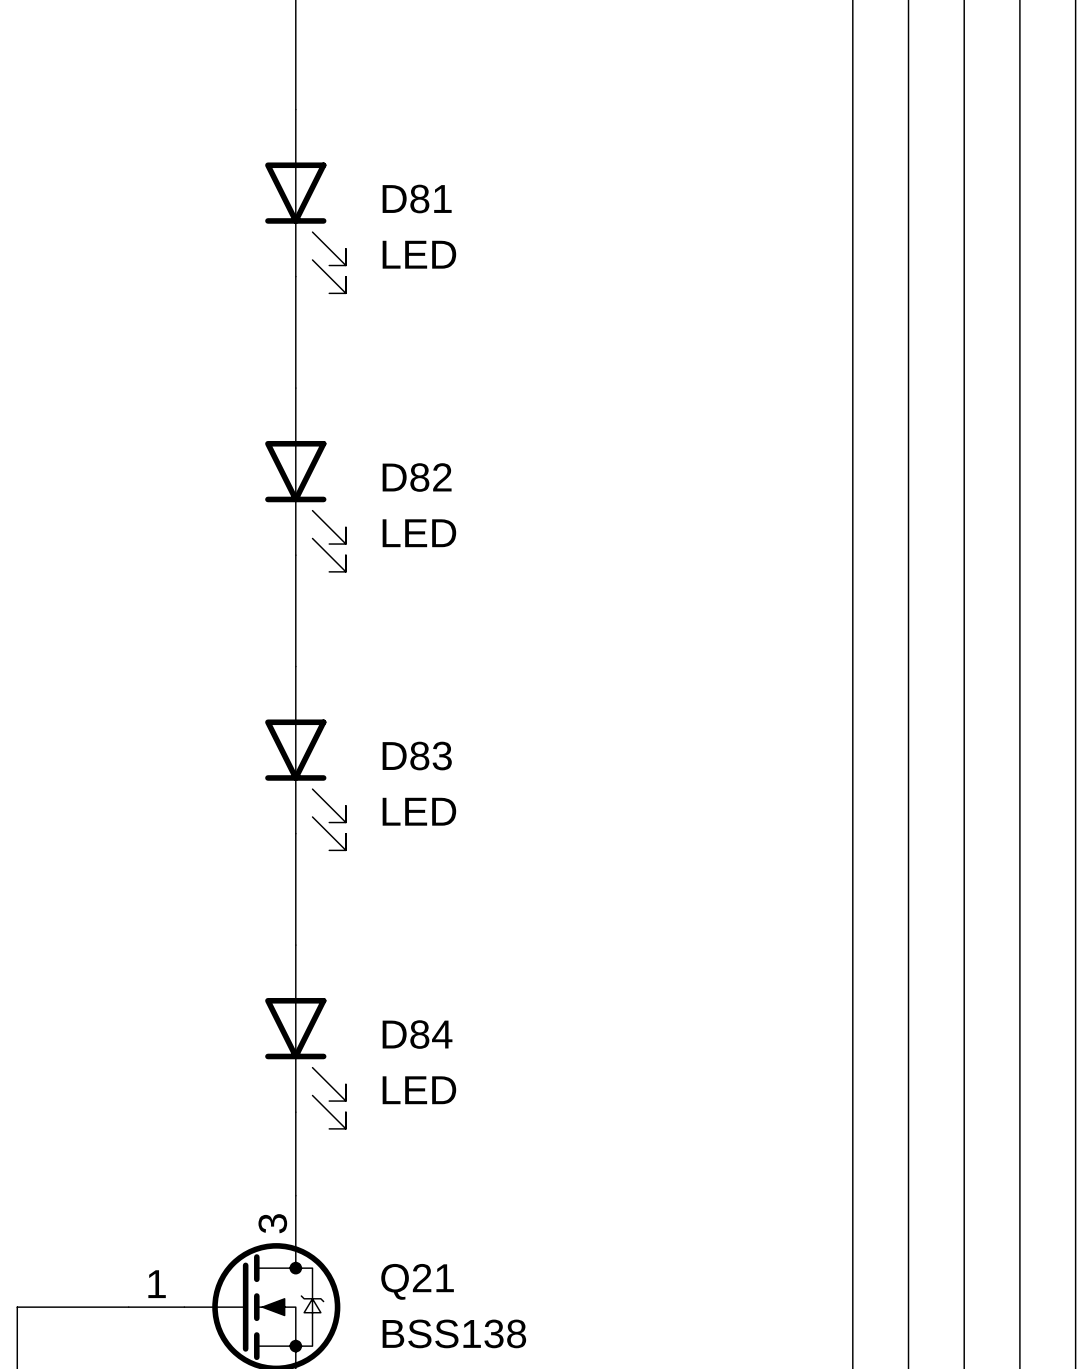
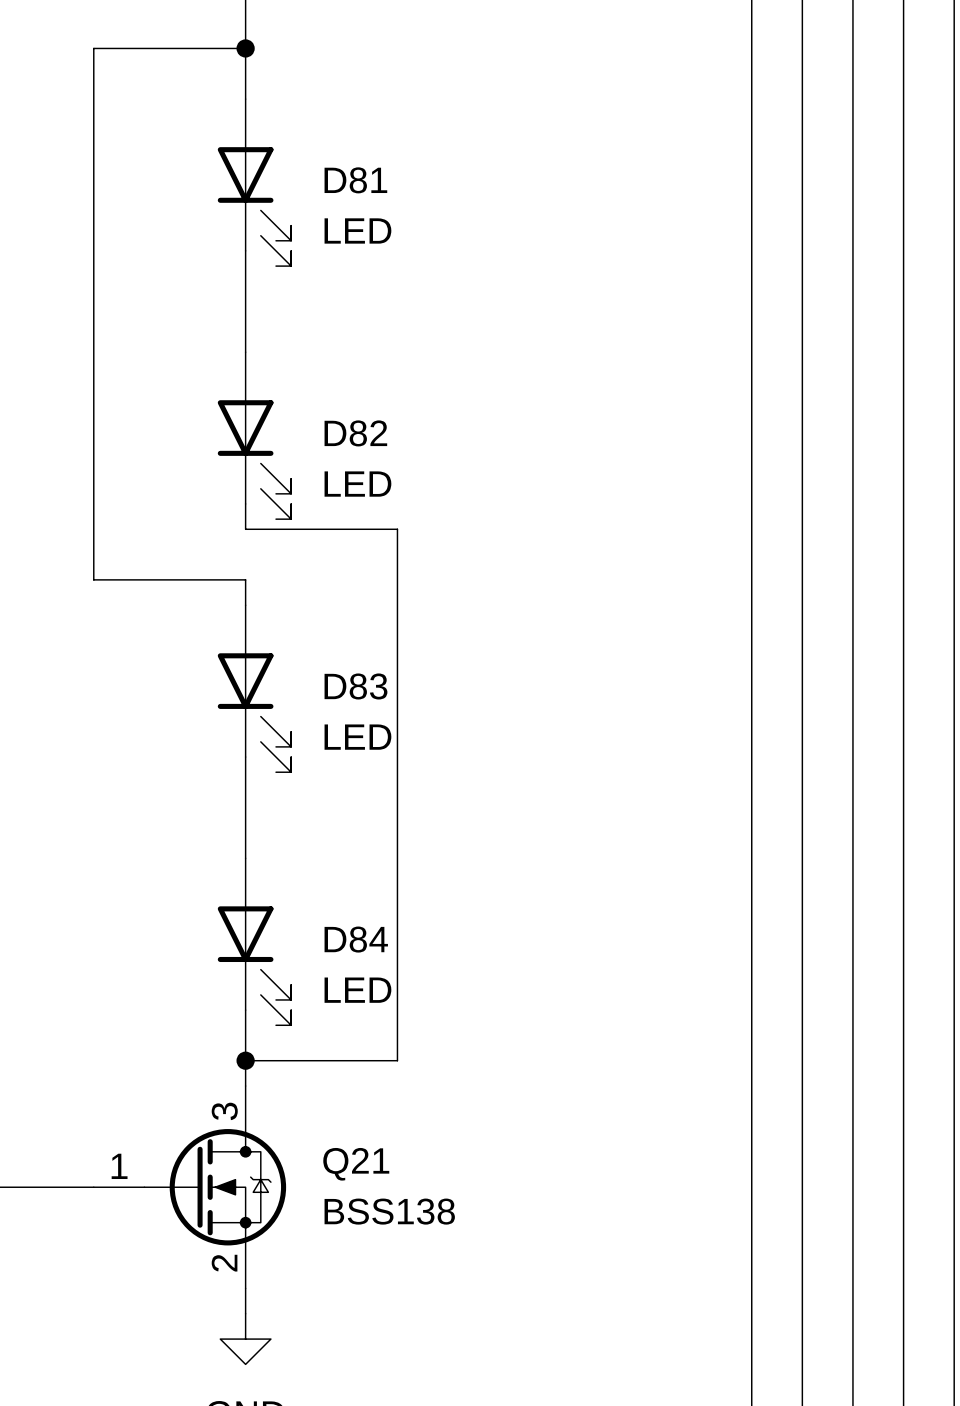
junction: none -> (245, 48)
wire: (295, 583) (295, 638) -> (245, 48) (93, 48) (93, 579) (245, 579)
wire: none -> (245, 529) (397, 529) (397, 1060) (245, 1060)
junction: none -> (245, 1060)

